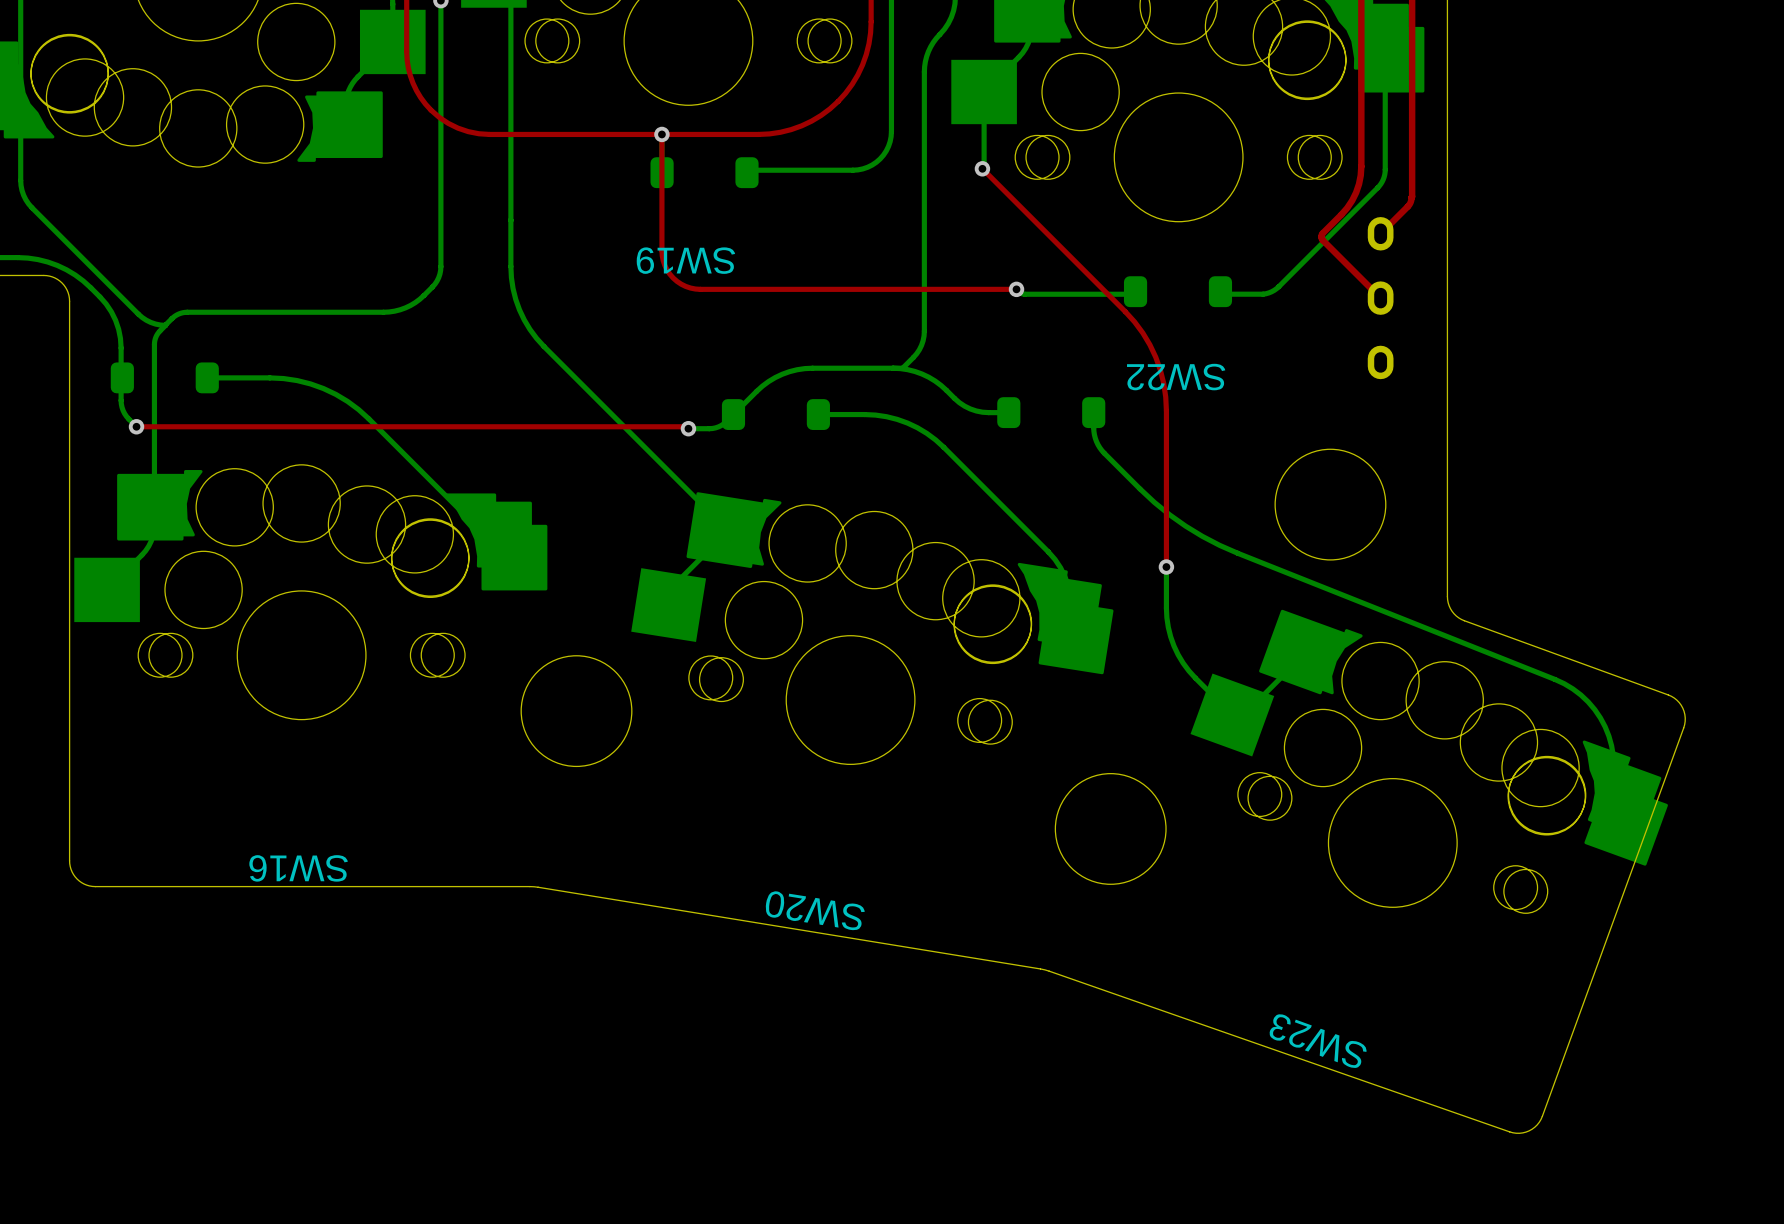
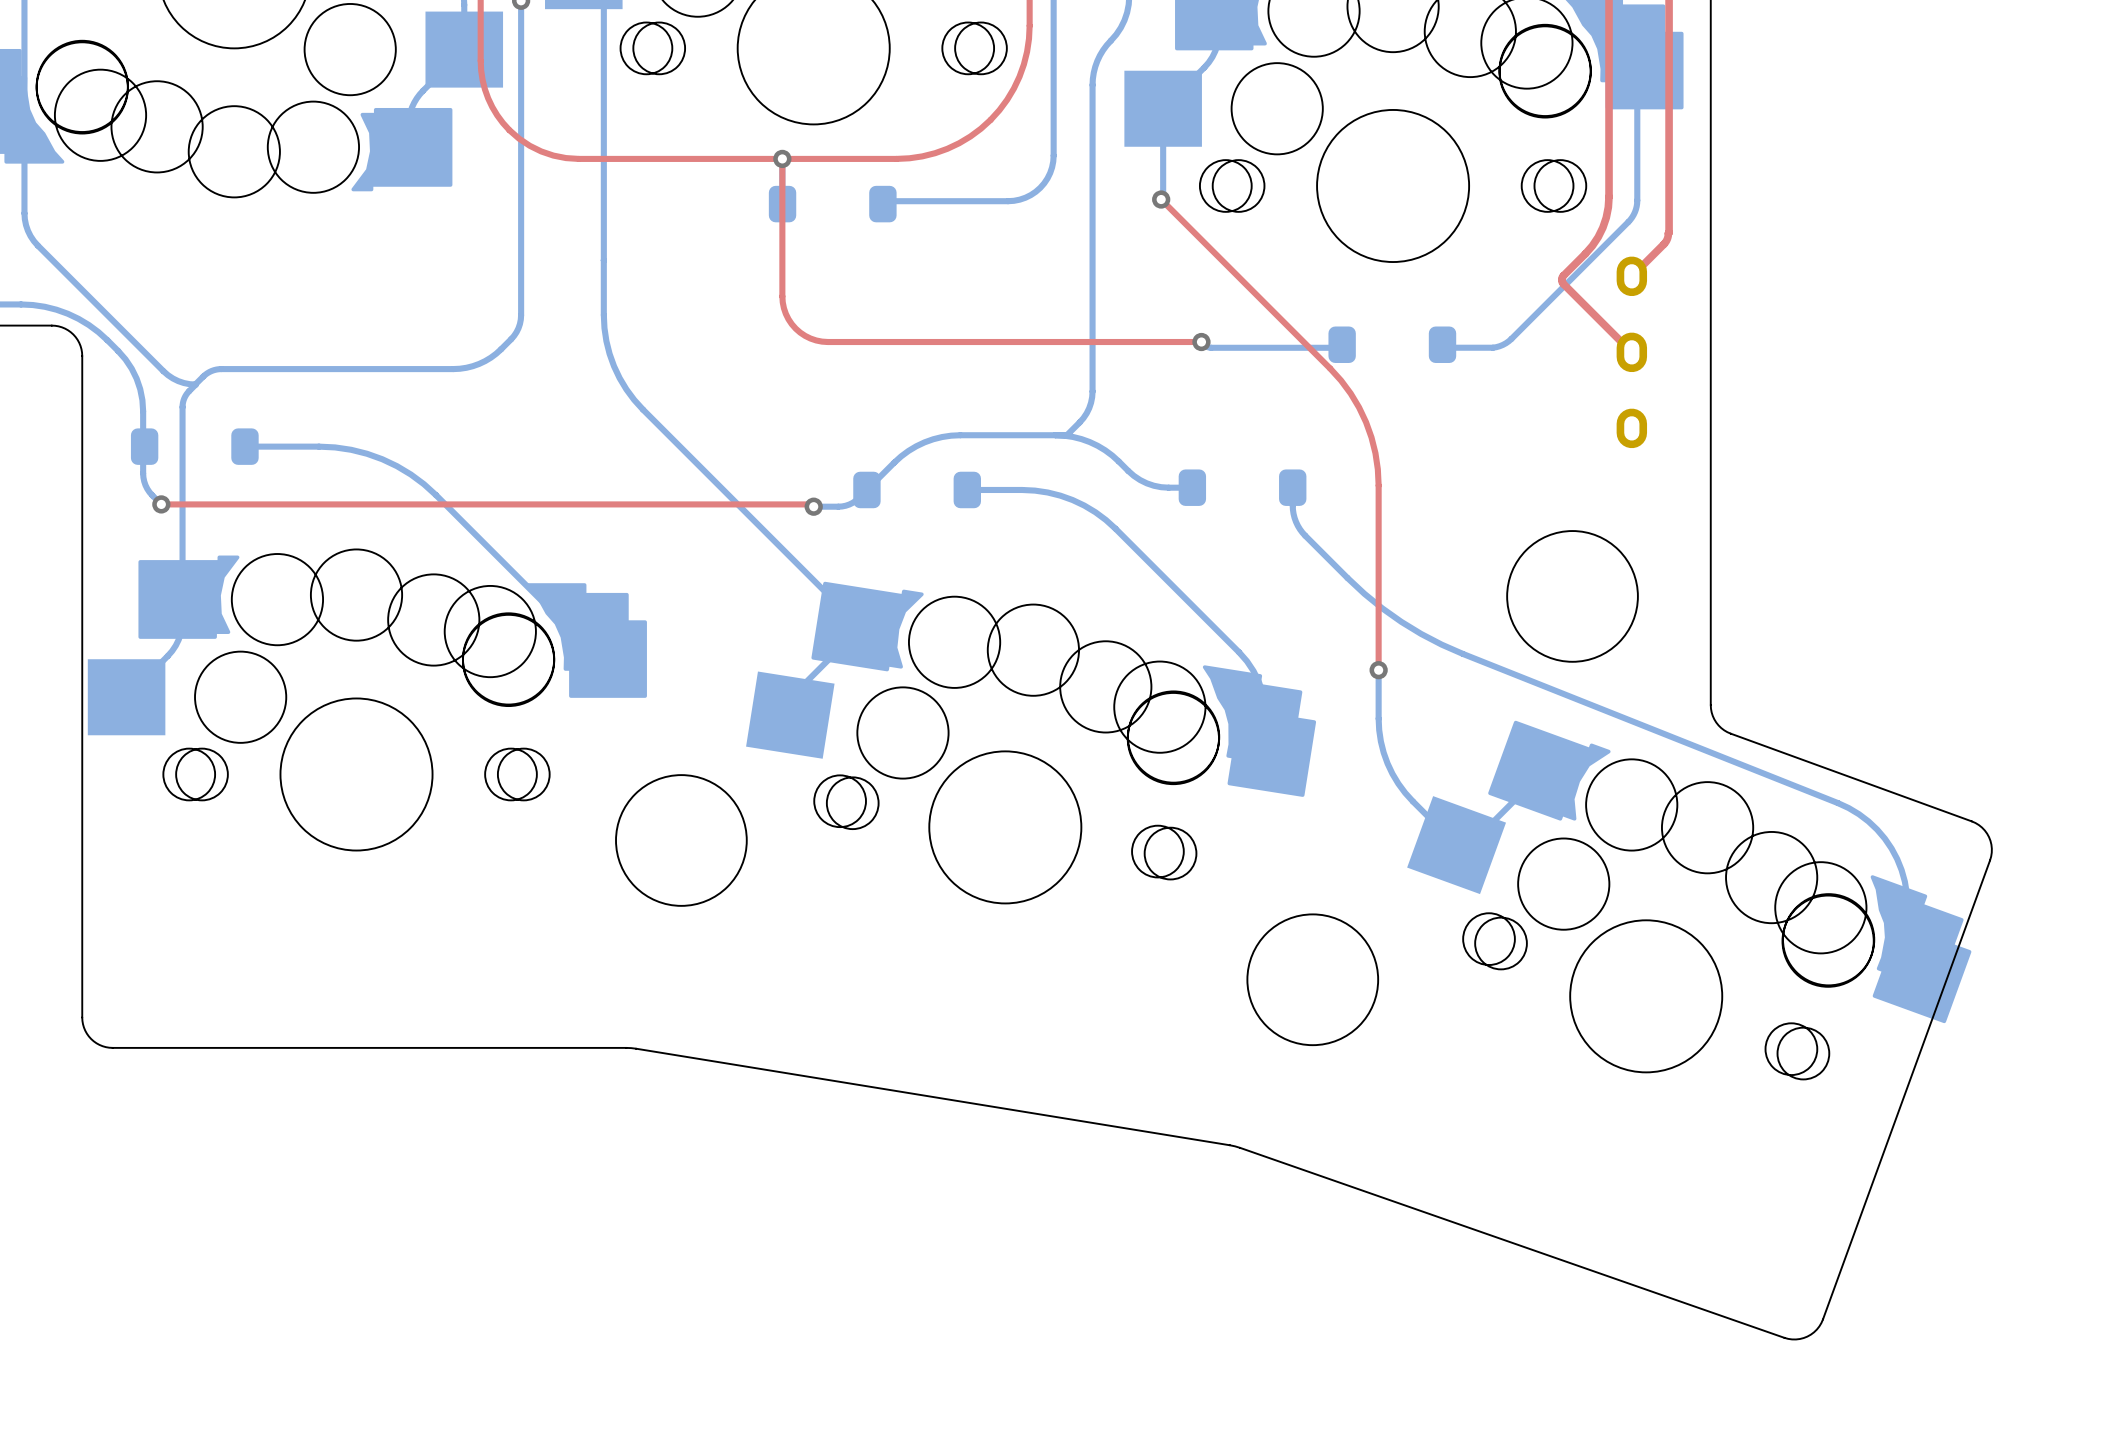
SW19 name: SW19 (685, 260) -> none
SW22 name: SW22 (1176, 377) -> none
SW16 name: SW16 (298, 868) -> none
SW20 name: SW20 (814, 910) -> none
SW23 name: SW23 (1318, 1041) -> none

